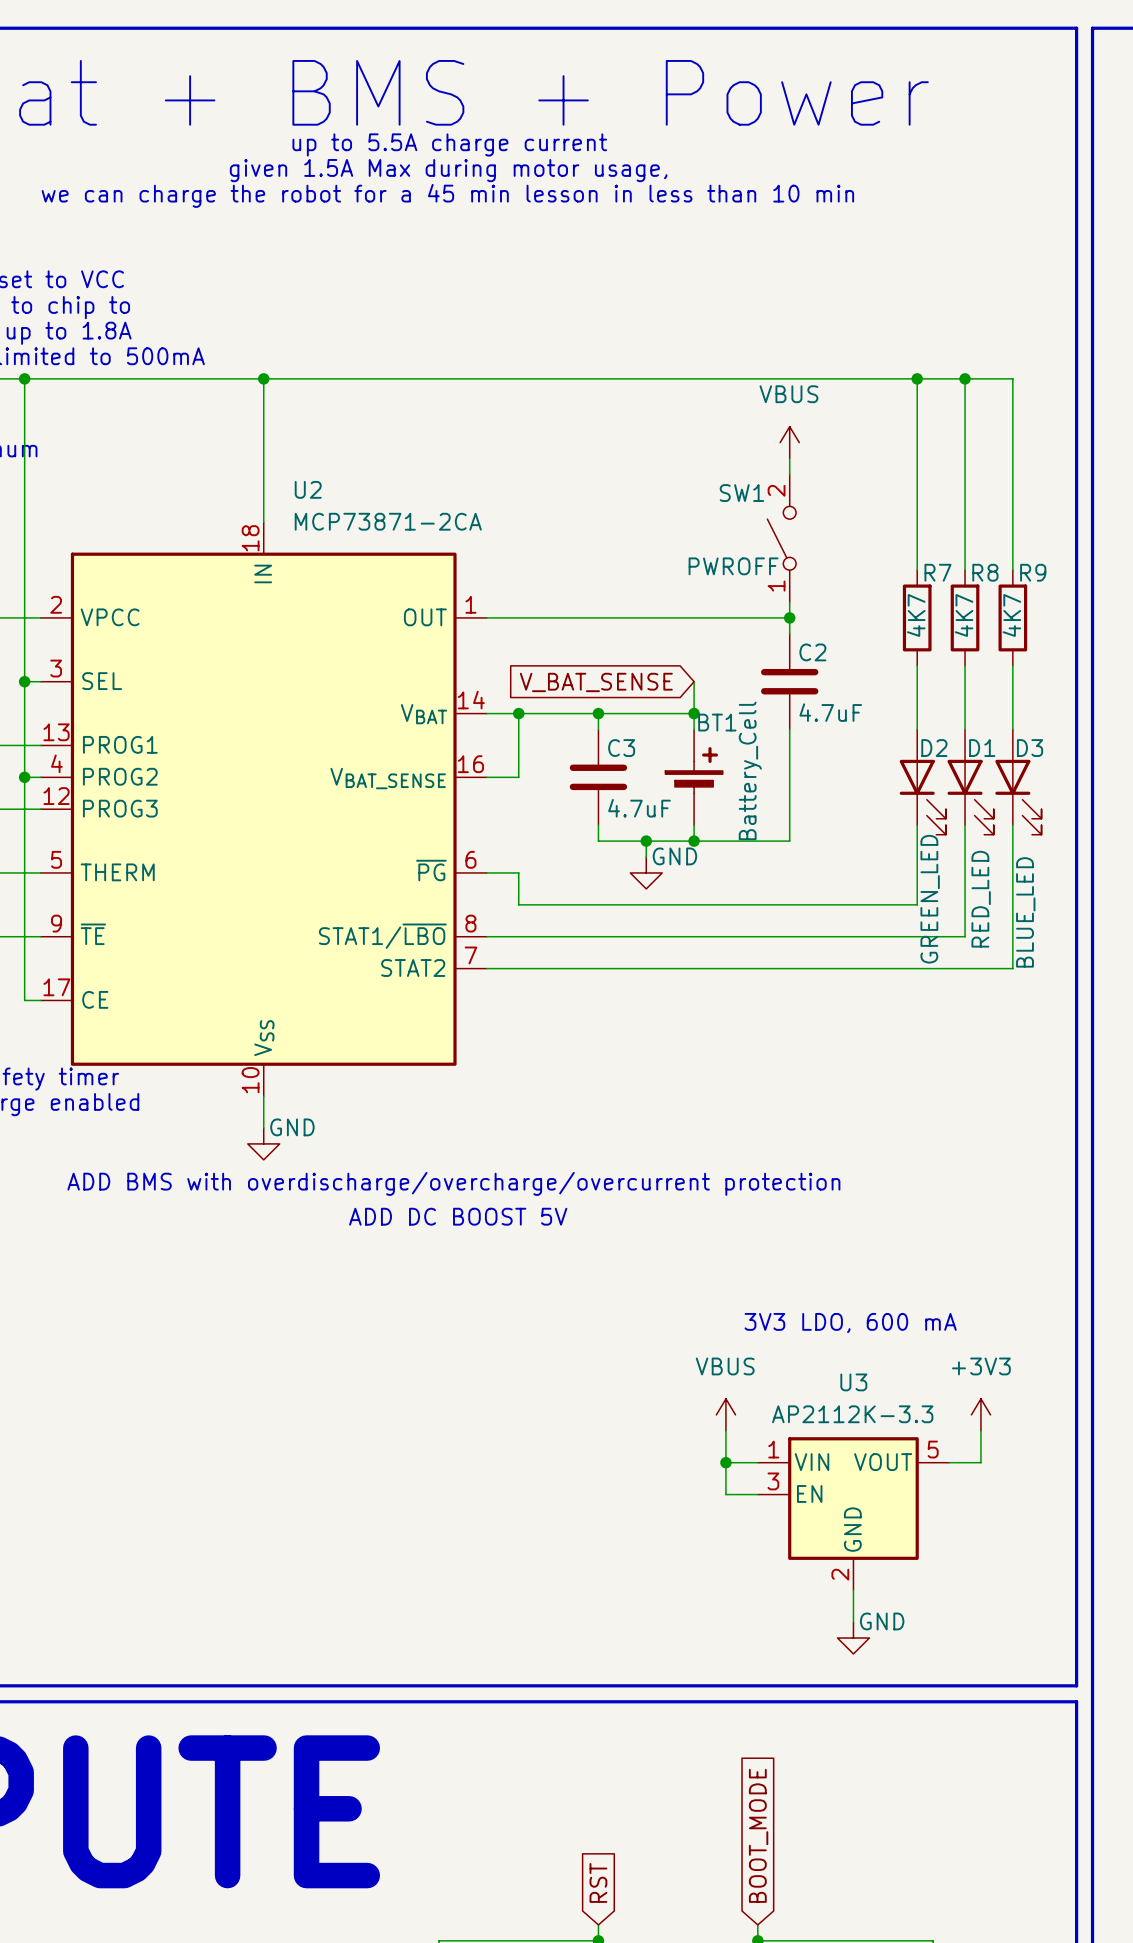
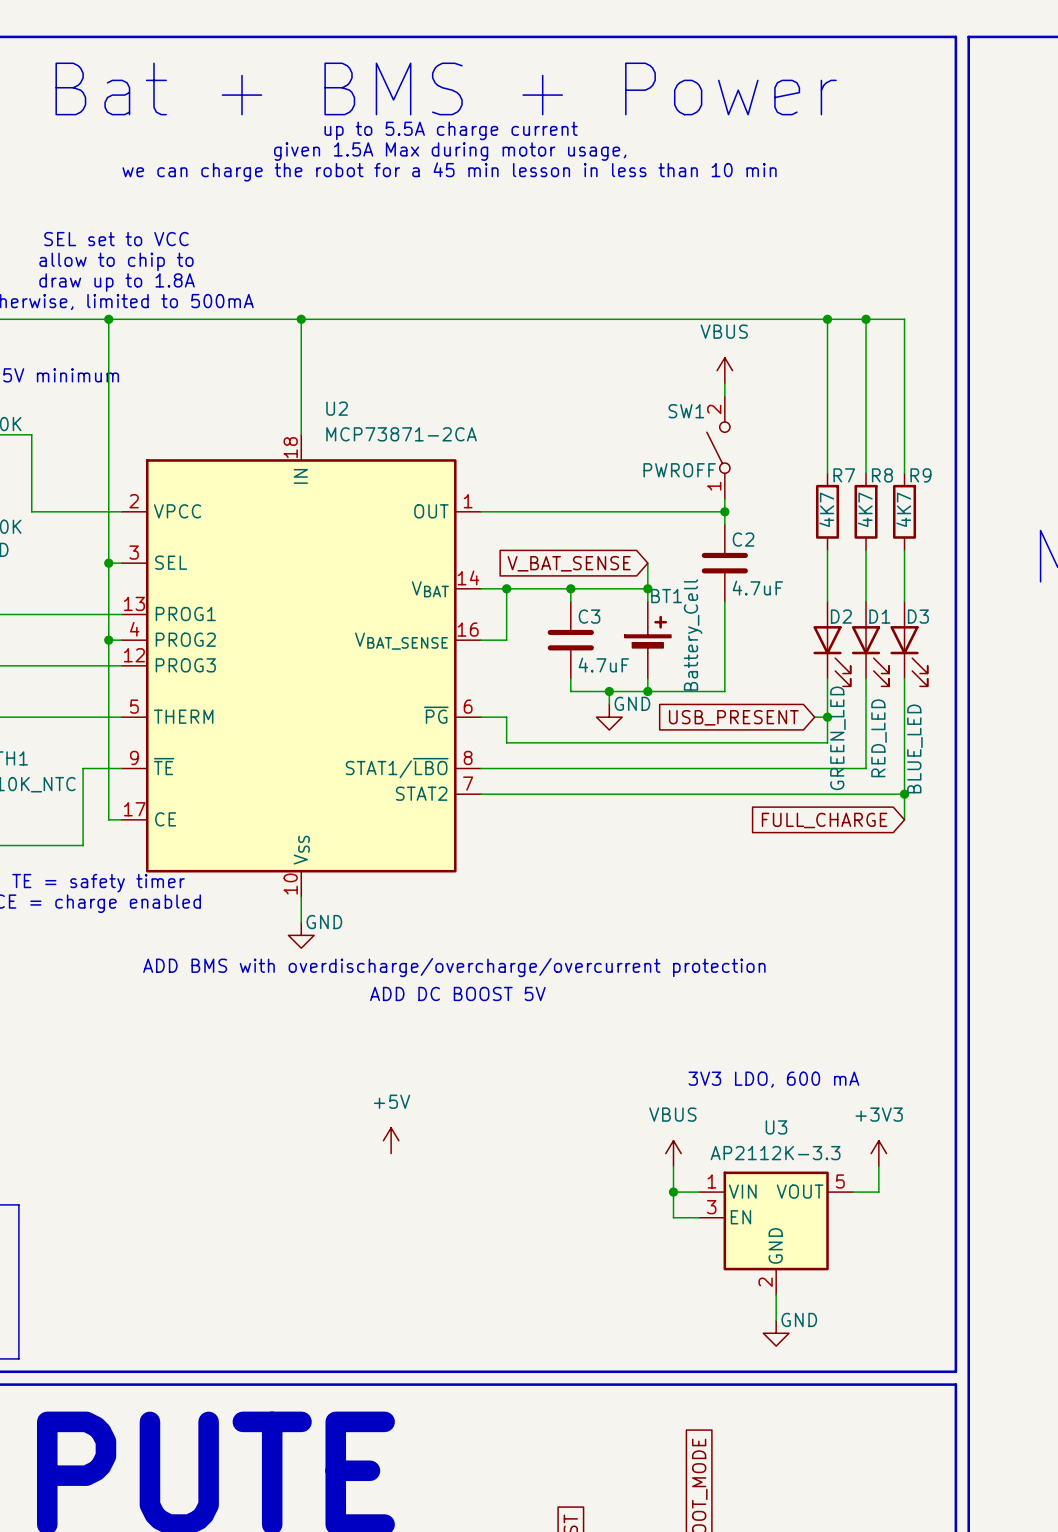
wire: none -> (814, 717) (827, 717)
junction: none -> (827, 717)
global label: none -> USB_PRESENT (733, 717)
wire: none -> (904, 794) (904, 819)
junction: none -> (904, 794)
global label: none -> FULL_CHARGE (824, 820)
power symbol: none -> +5V (391, 1140)

